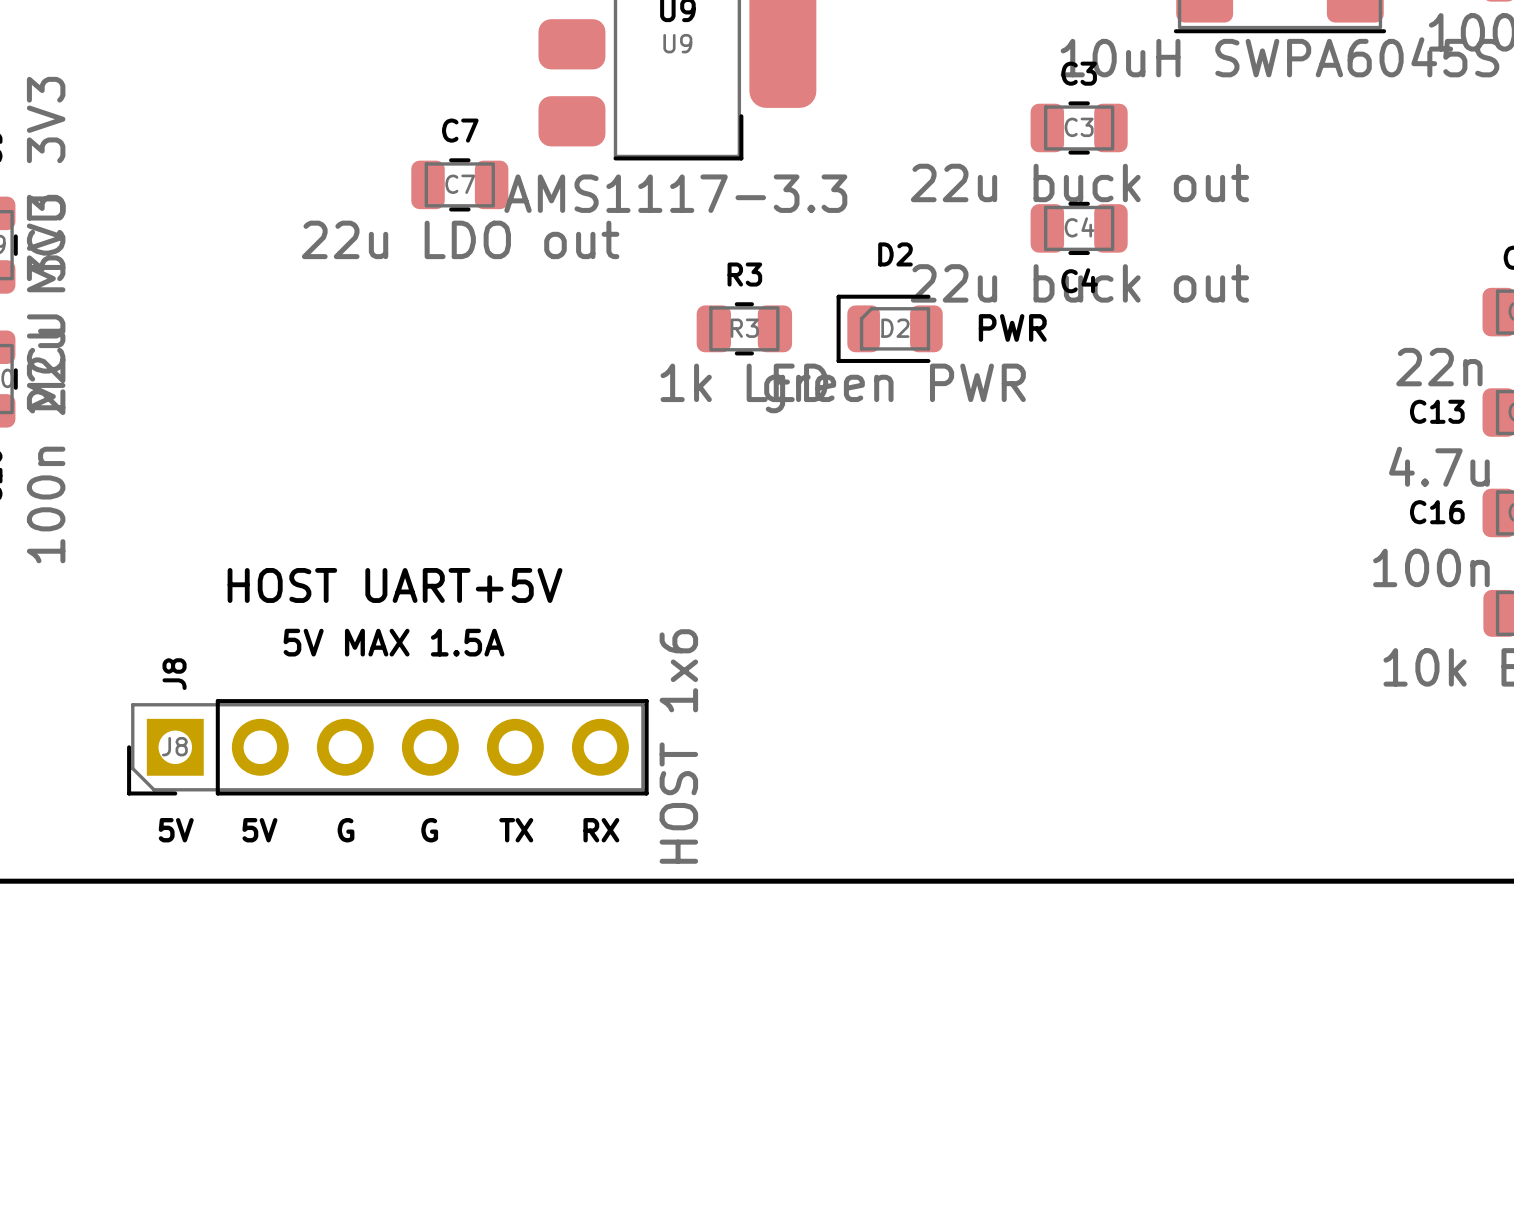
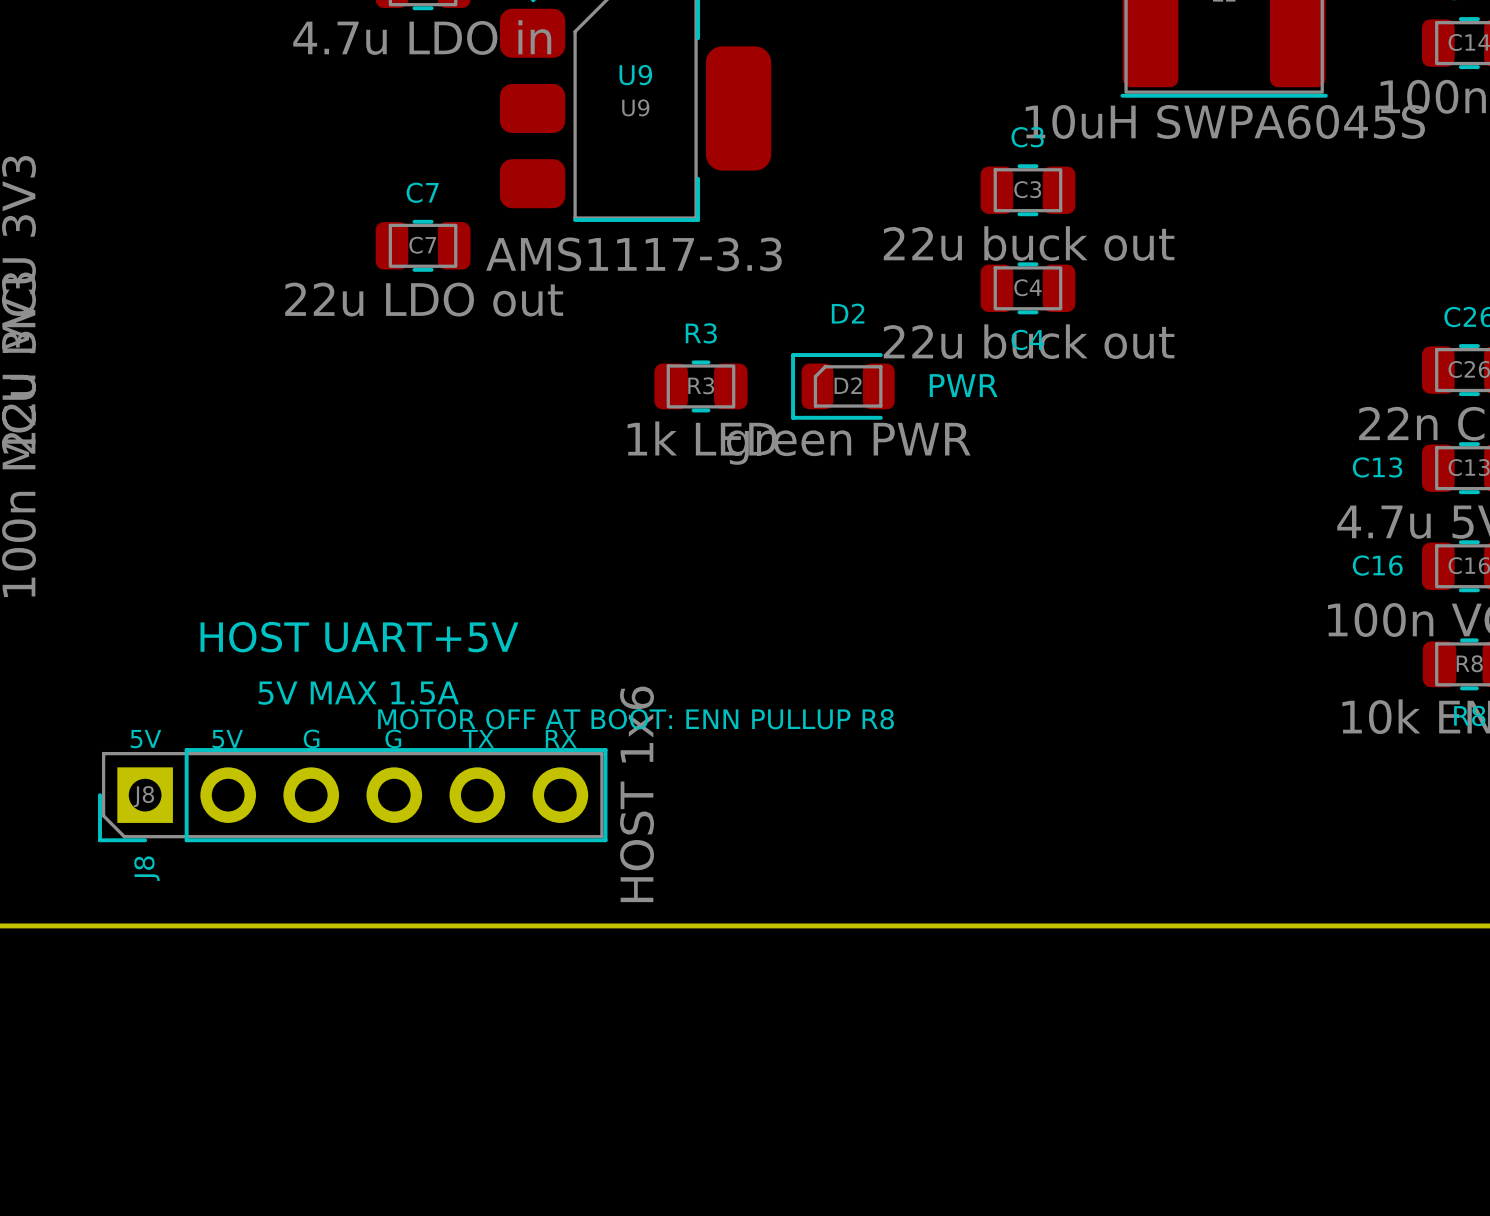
text: none -> MOTOR OFF AT BOOT: ENN PULLUP R8 (636, 719)
J8 name position: J8 (174, 674) -> J8 (146, 868)
text: none -> 5V (145, 739)
text: none -> 5V (227, 739)
text: none -> G (311, 738)
text: none -> G (393, 738)
text: 5V (176, 830) -> none
text: 5V (259, 830) -> none
text: G (346, 830) -> none
text: G (429, 830) -> none
text position: TX (516, 830) -> TX (478, 738)
text position: RX (601, 830) -> RX (561, 738)

